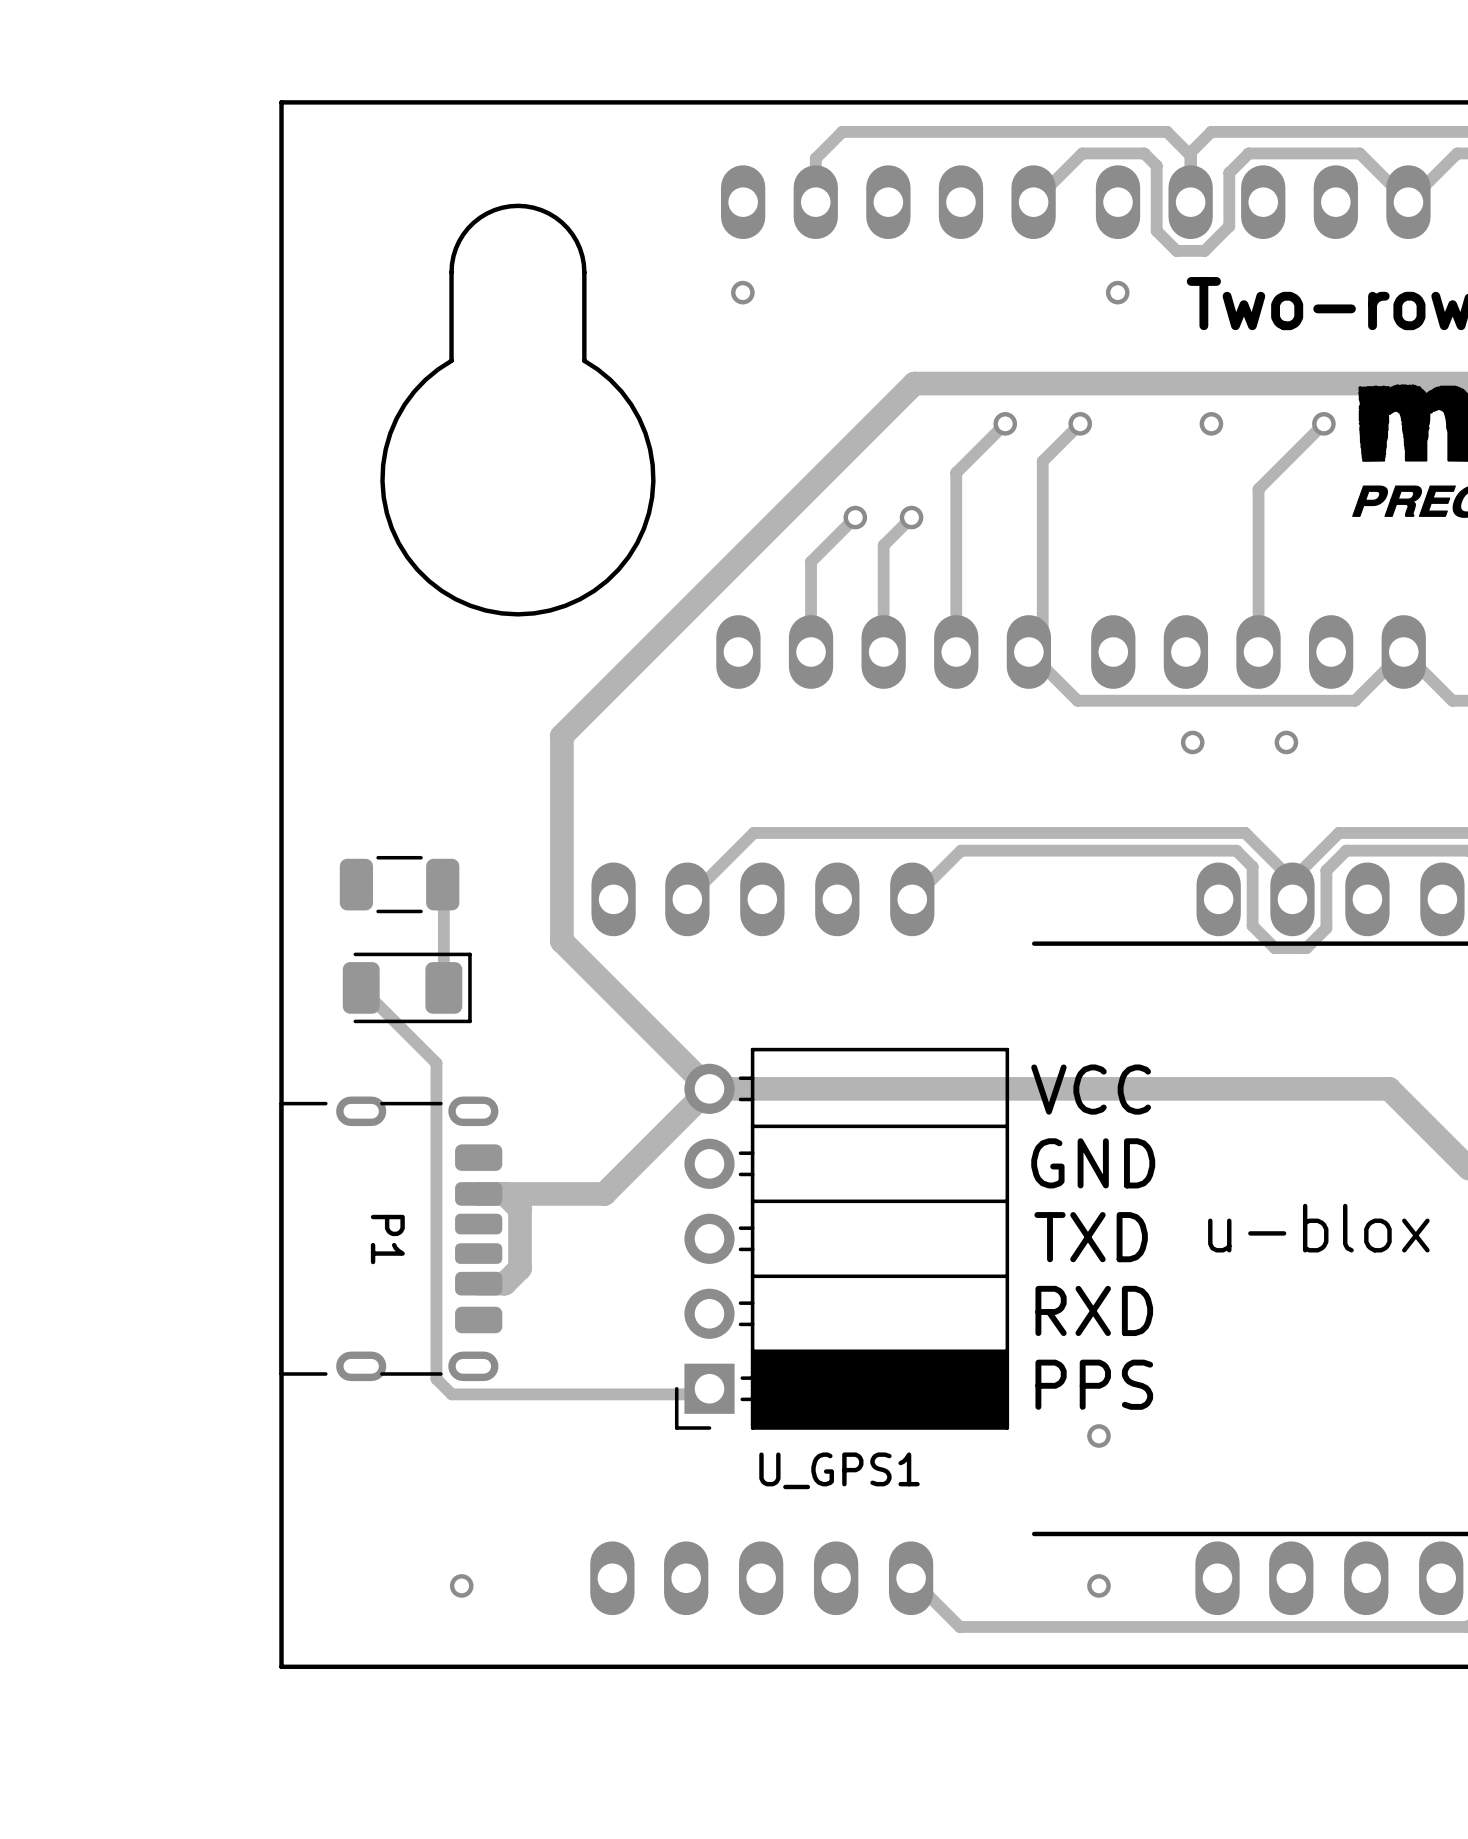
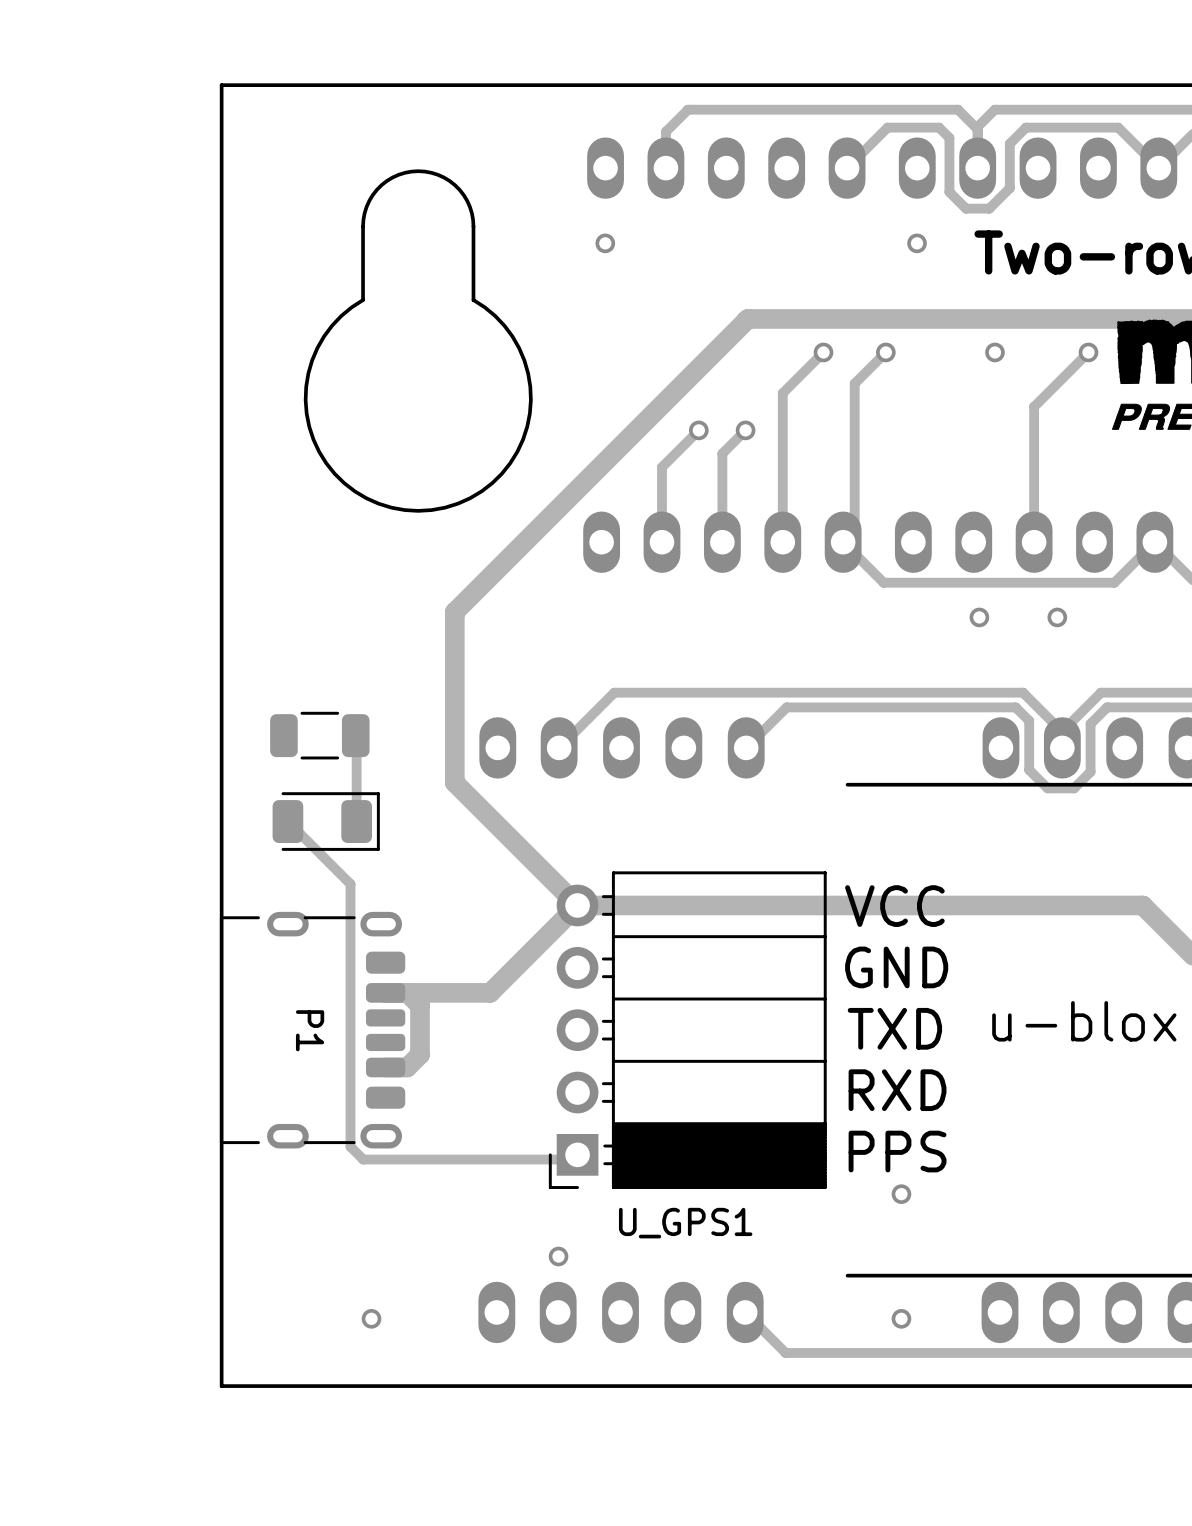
via: none -> (558, 1256)

